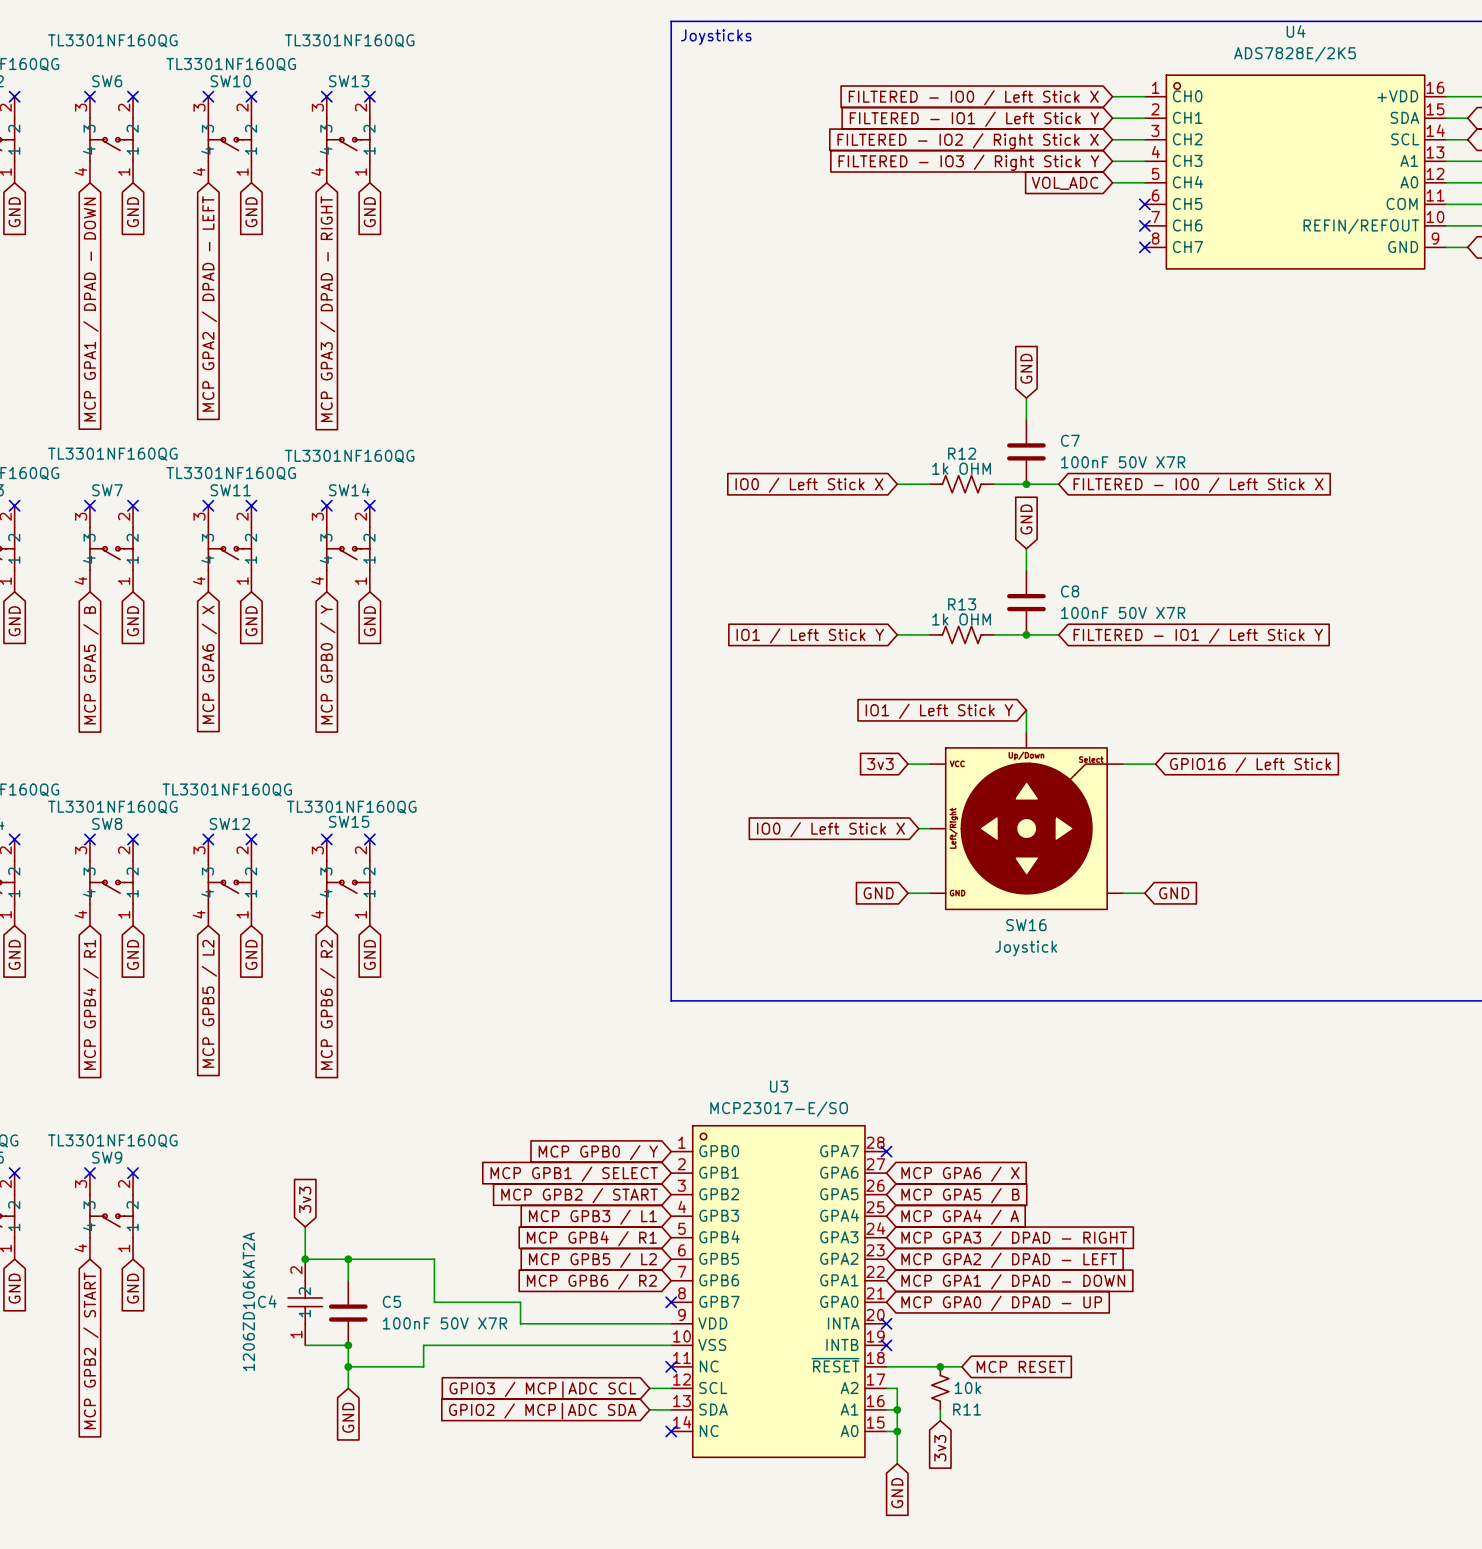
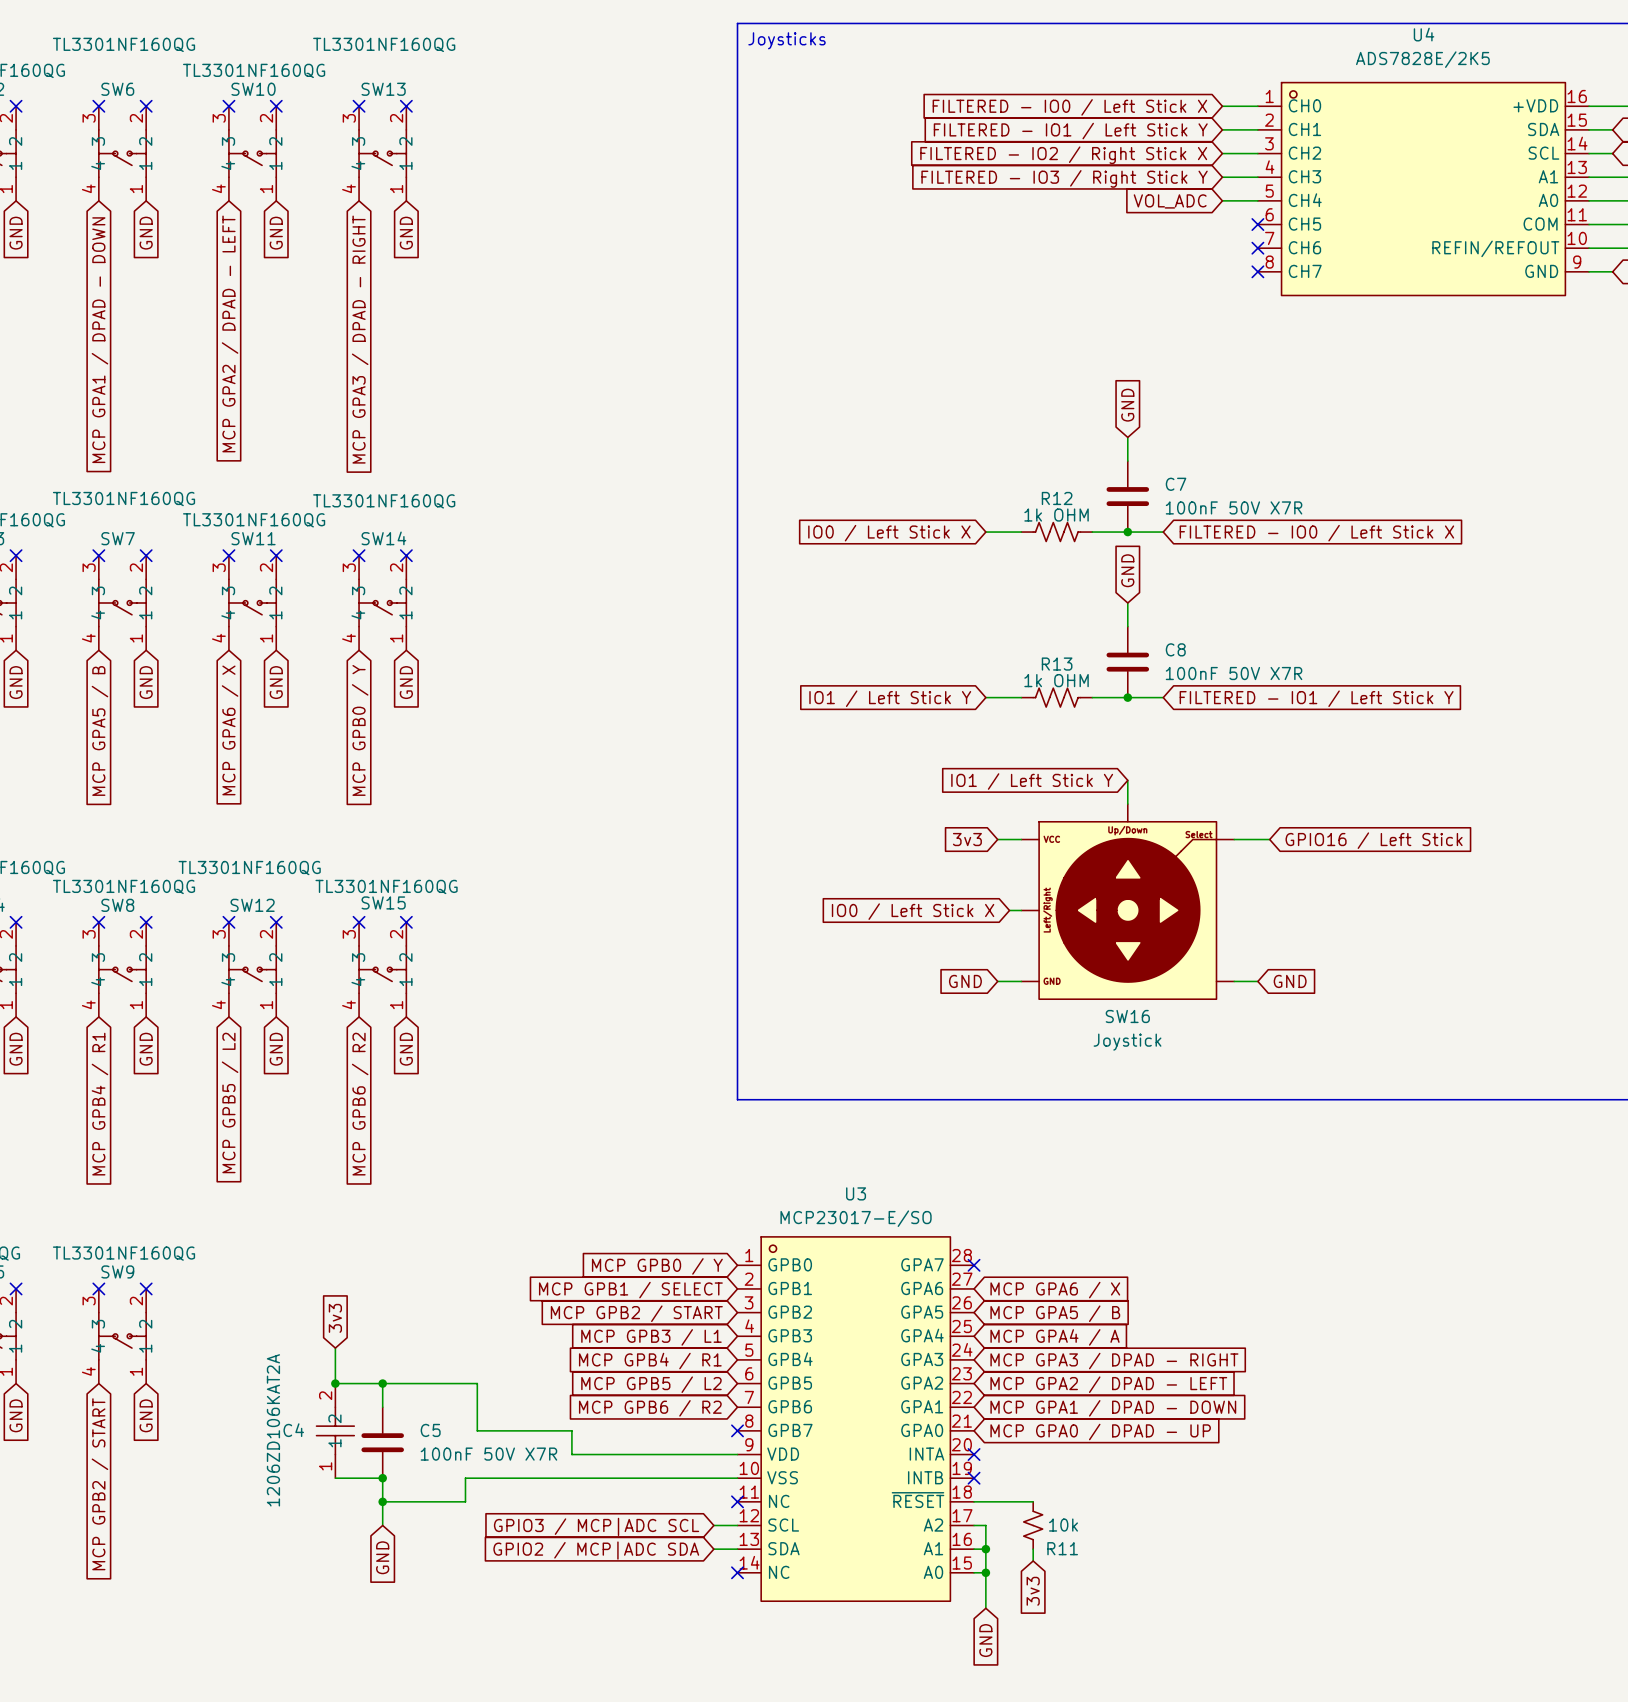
wire: (940, 1366) (961, 1366) -> none
junction: (940, 1366) -> none
global label: MCP RESET (1020, 1366) -> none

